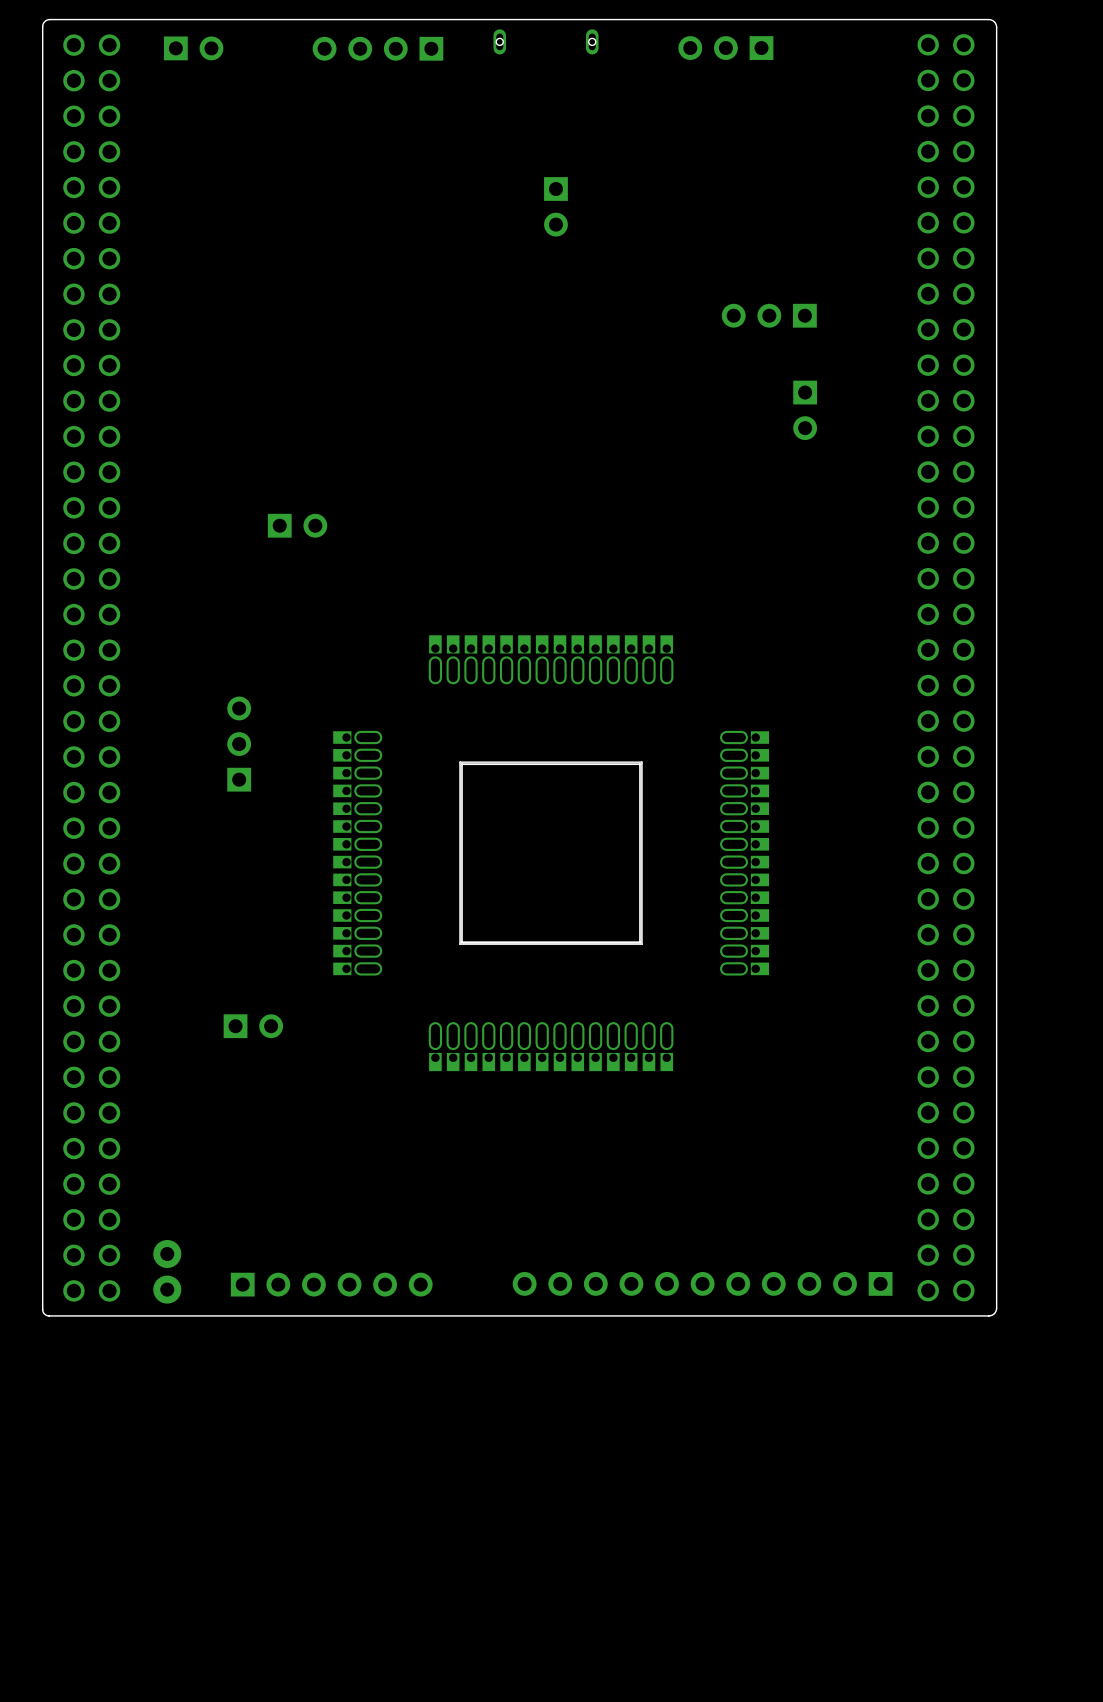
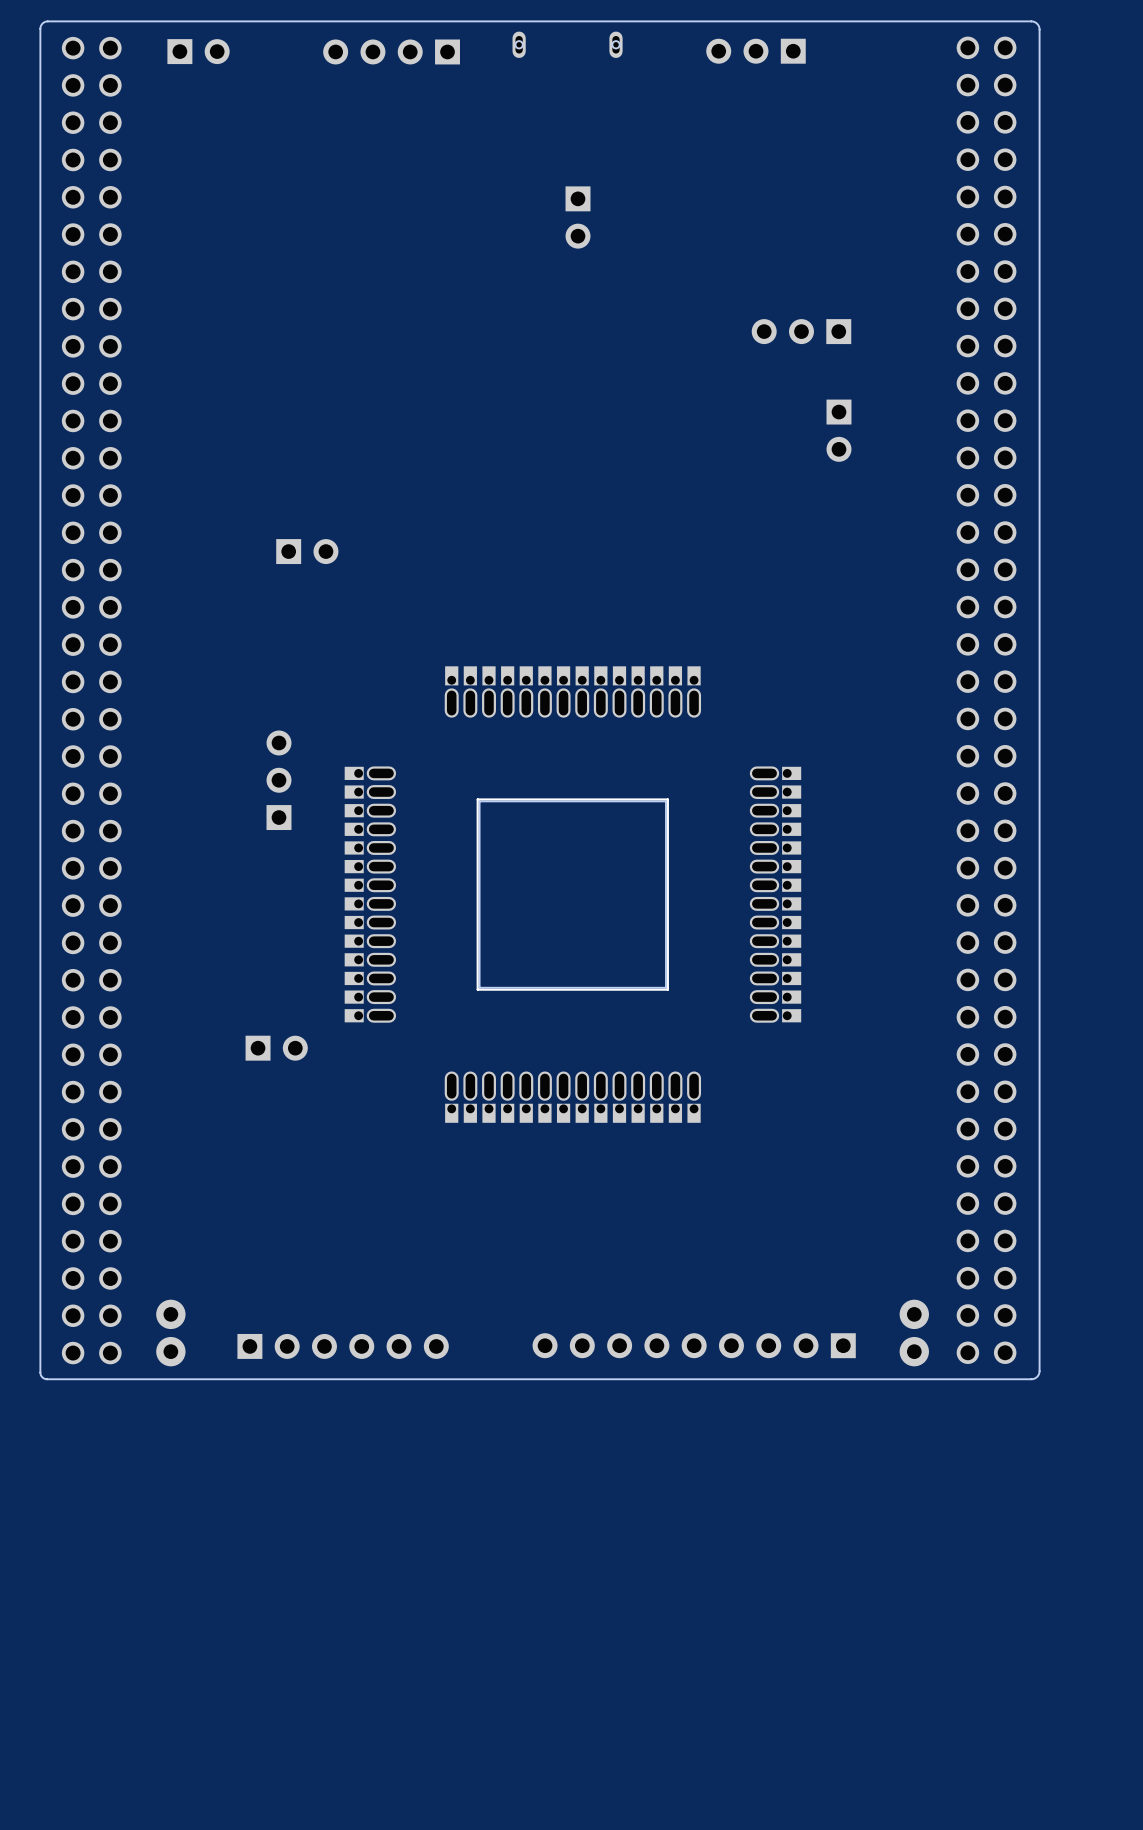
part position: (239, 744) -> (278, 780)
part position: (253, 1026) -> (276, 1048)
part: none -> (914, 1333)
part: none -> (694, 1345)
part: (702, 1283) -> none

